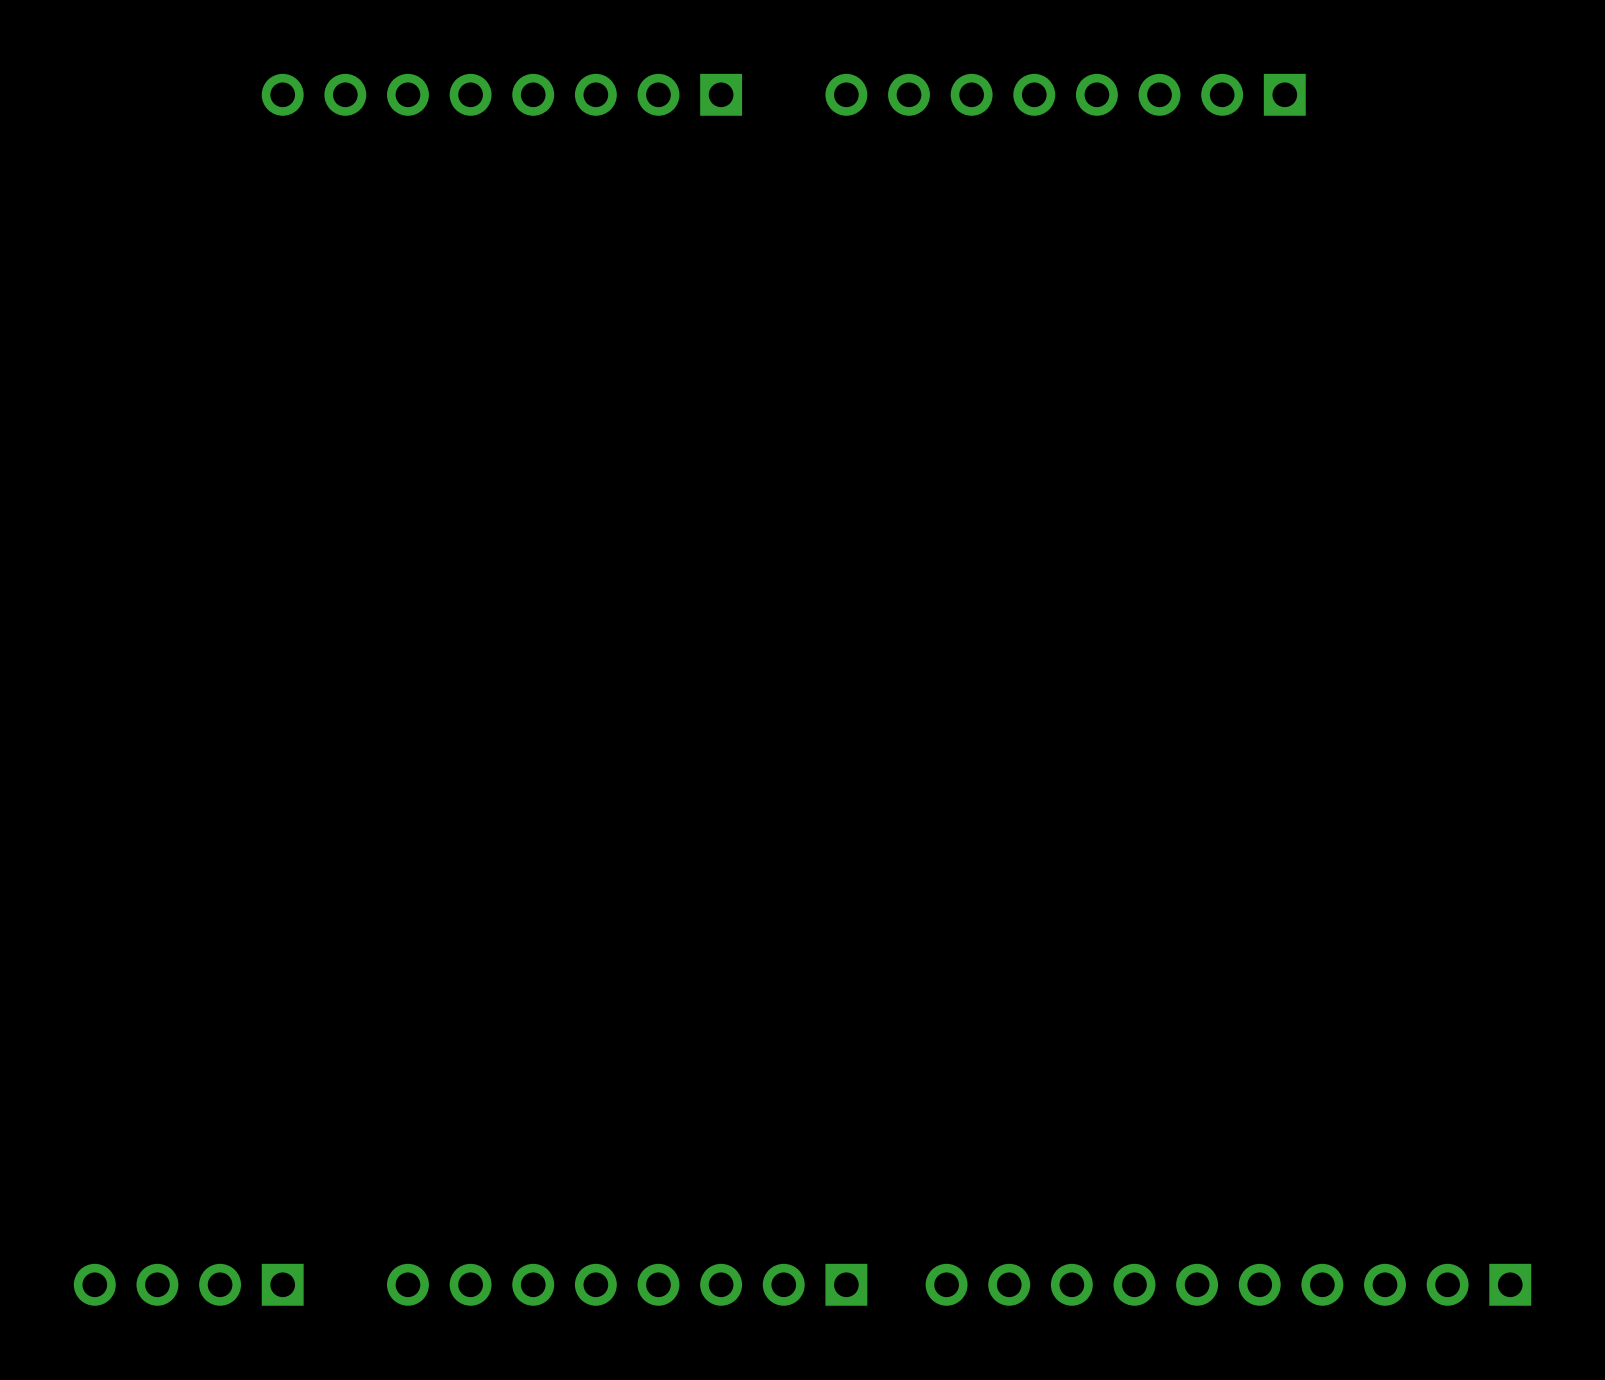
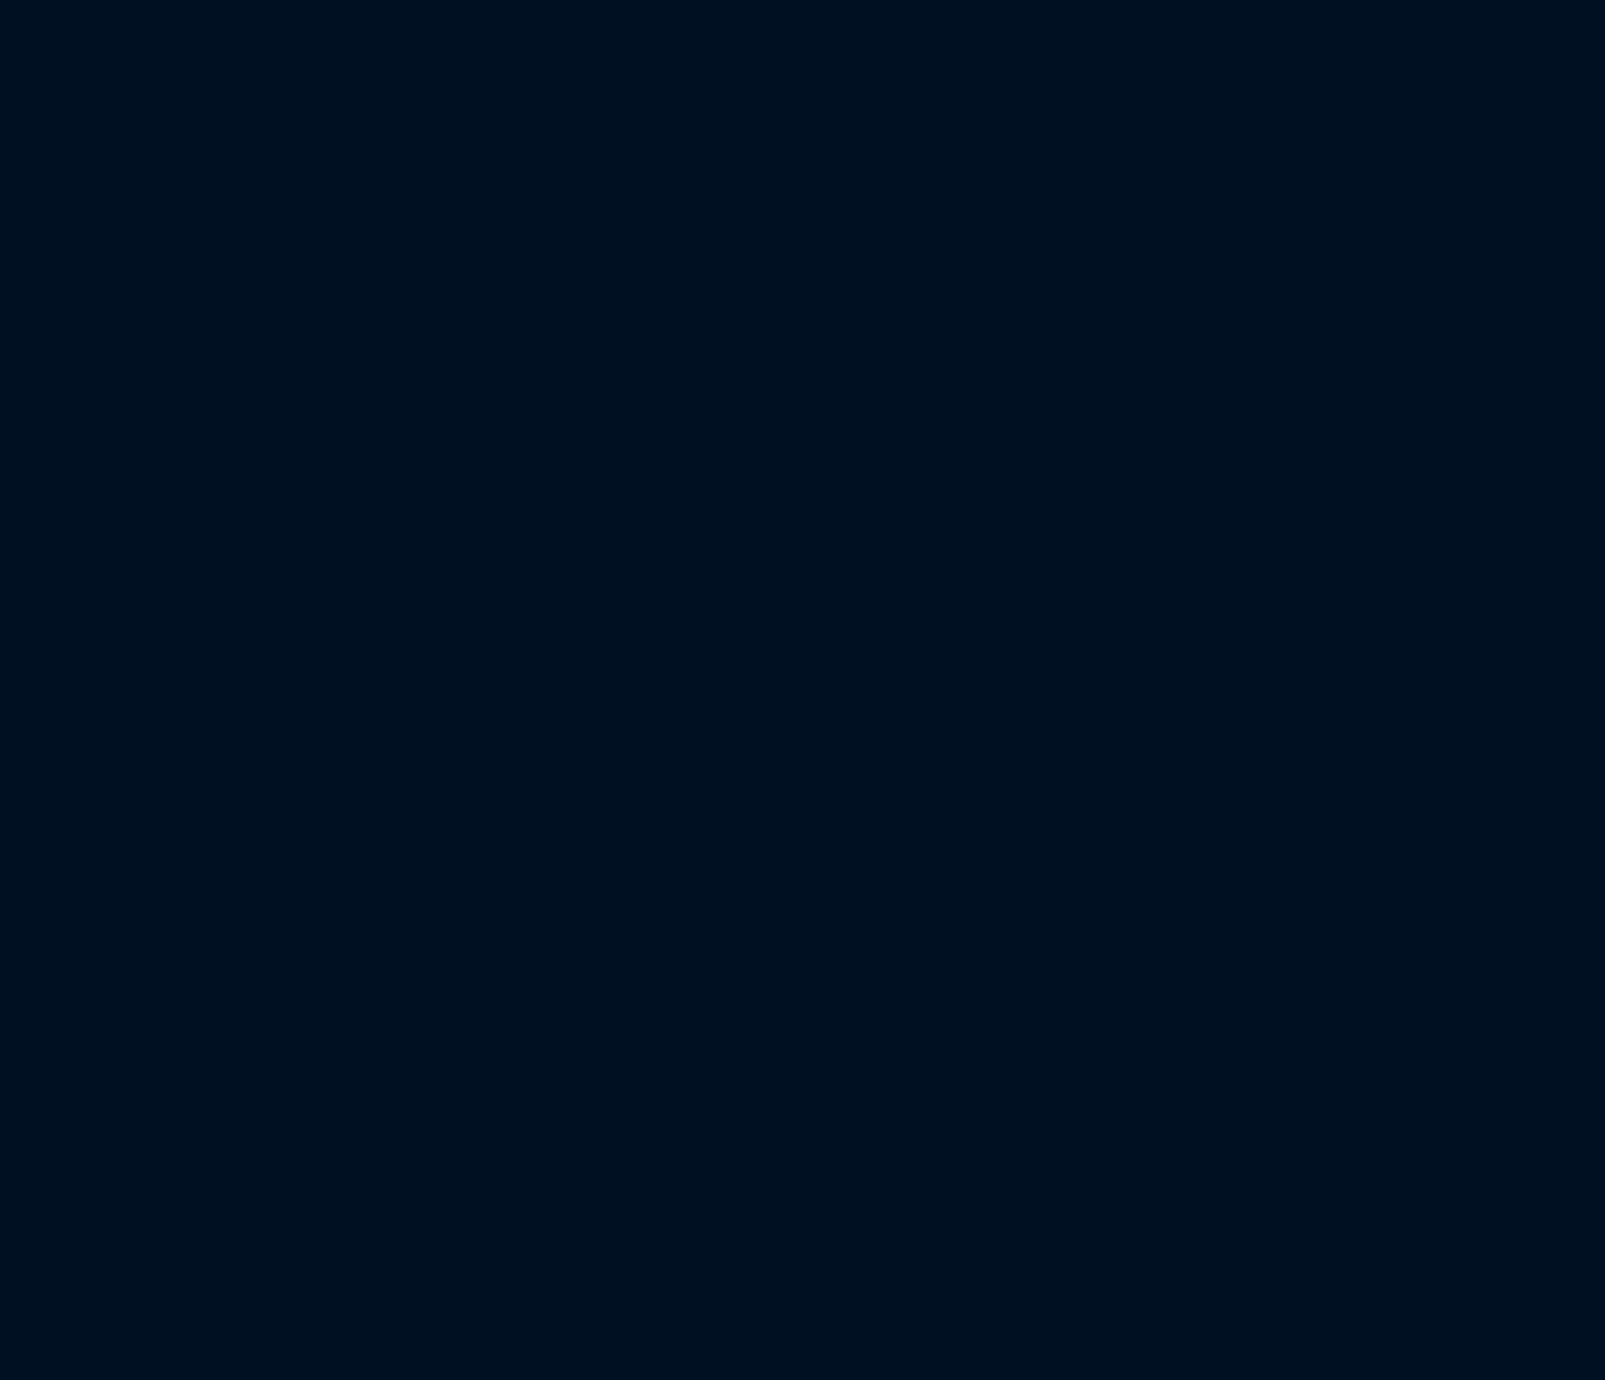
part: (501, 94) -> none
part: (1065, 94) -> none
part: (188, 1284) -> none
part: (627, 1284) -> none
part: (1228, 1284) -> none

